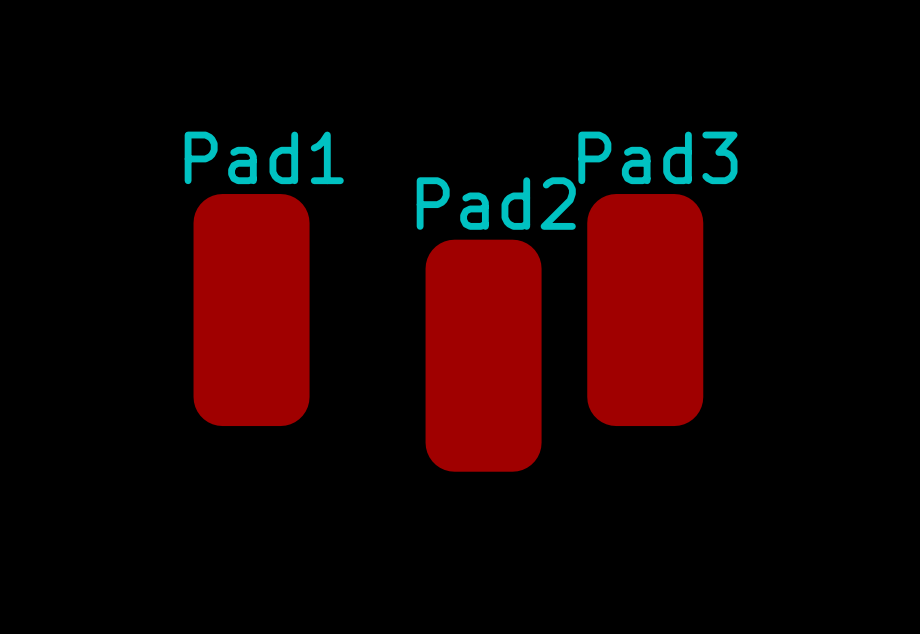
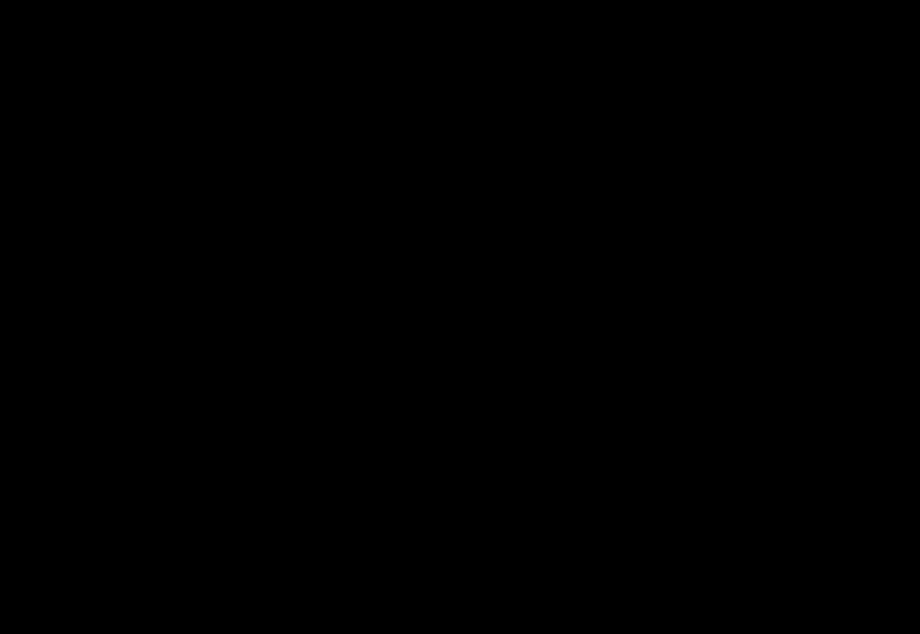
Pad1: (251, 310) -> none
Pad3: (645, 310) -> none
Pad2: (483, 355) -> none

